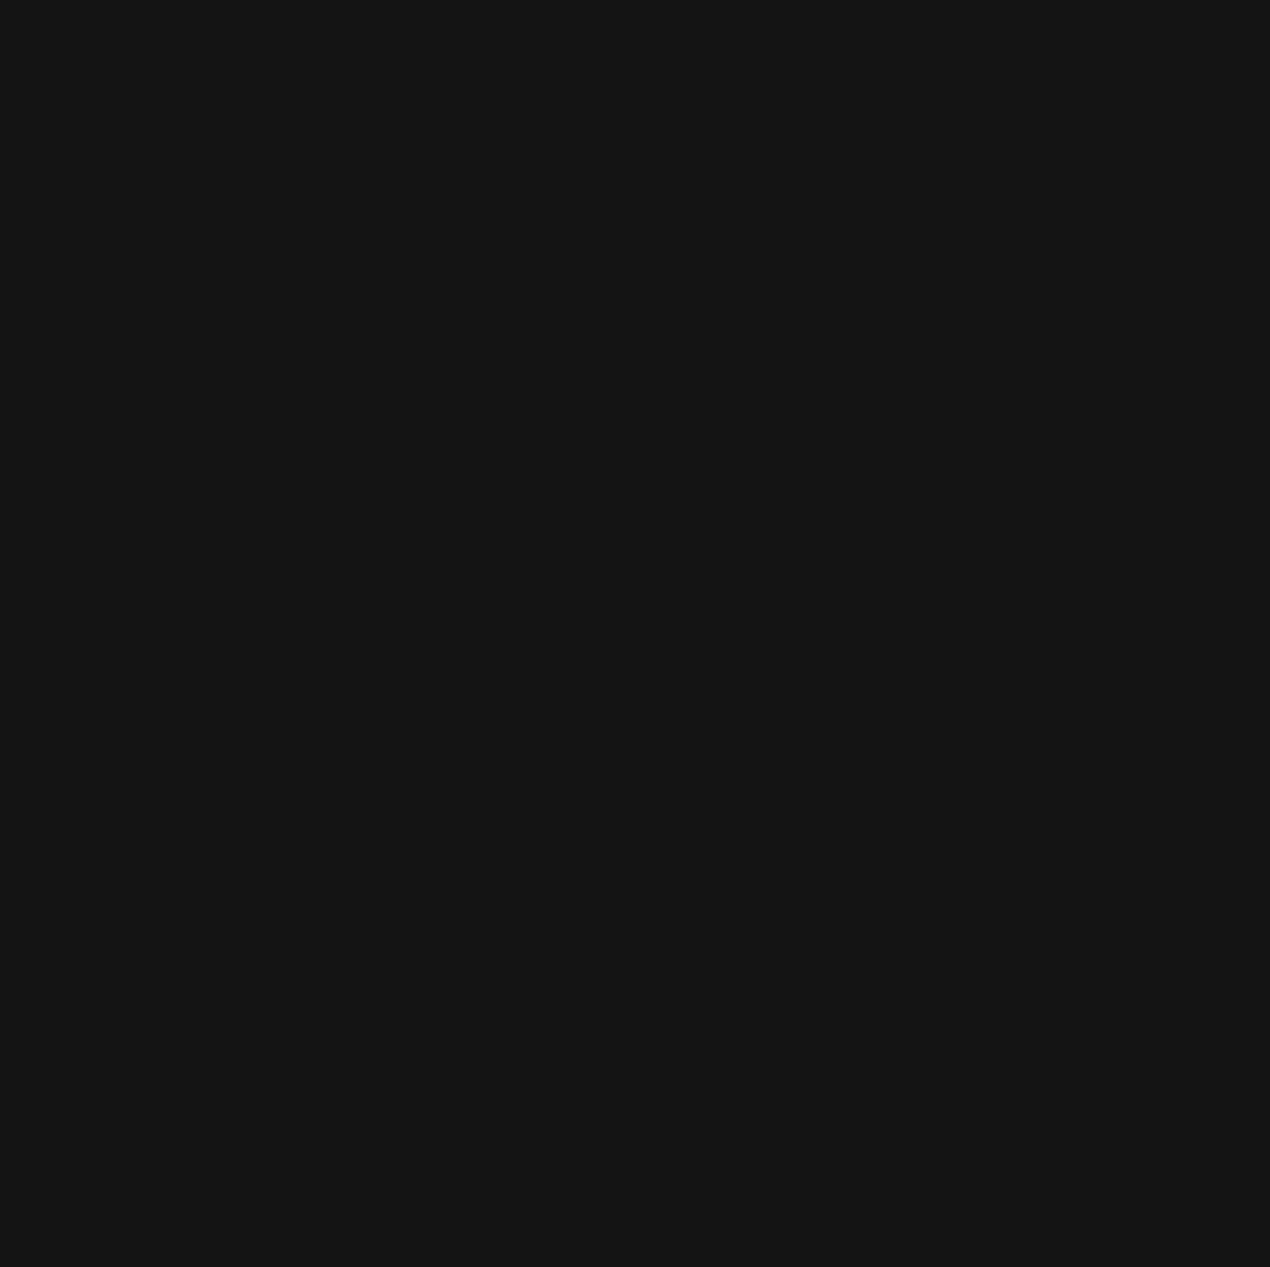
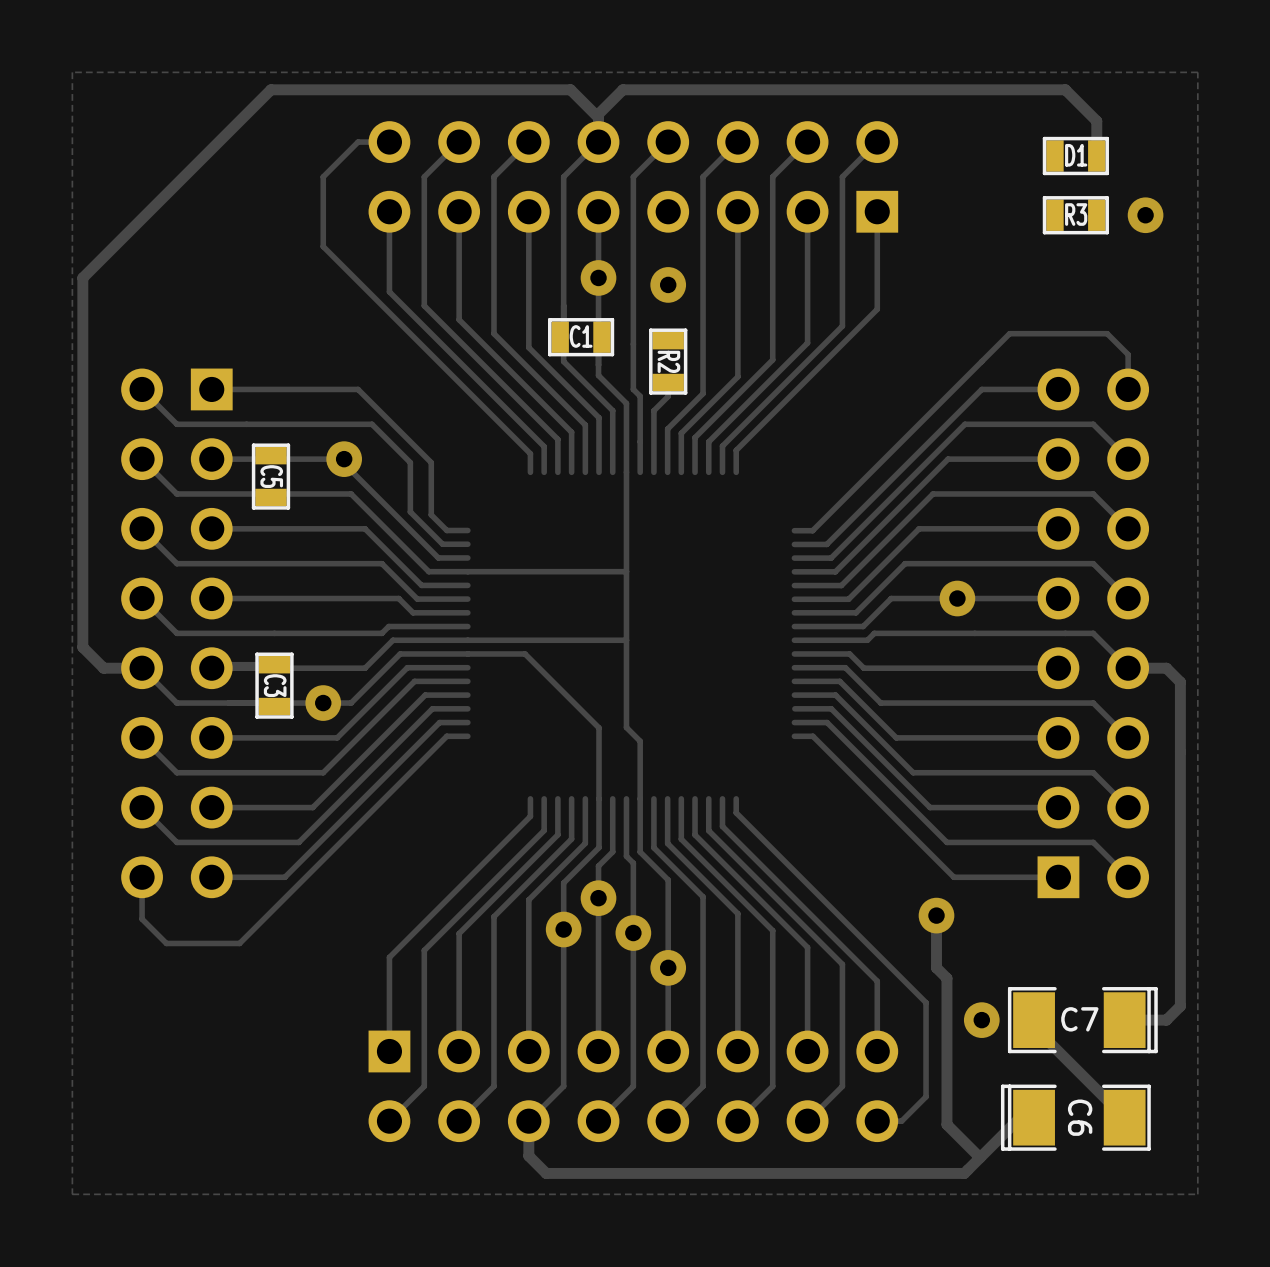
zone outline: none -> (1197, 72) (1197, 1194) (72, 1194) (72, 72) (1197, 72)
track: none -> (598, 117) (570, 89) (270, 89) (82, 277) (82, 647) (103, 668) (142, 668) (176, 703) (351, 703) (400, 653) (525, 653) (599, 727) (599, 847) (563, 882) (563, 1086) (528, 1121) (528, 1156) (546, 1173) (964, 1173) (1020, 1117)
track: none -> (389, 142) (358, 142) (323, 176) (323, 246) (530, 453) (530, 472)
track: none -> (459, 142) (424, 176) (424, 305) (557, 439) (557, 472)
track: none -> (528, 142) (493, 176) (493, 333) (585, 425) (585, 472)
track: none -> (668, 142) (633, 176) (633, 389) (640, 396) (640, 472)
track: none -> (737, 142) (703, 176) (703, 393) (667, 429) (667, 472)
track: none -> (807, 142) (772, 176) (772, 359) (695, 437) (695, 472)
track: none -> (877, 142) (842, 176) (842, 326) (722, 446) (722, 472)
D1: none -> (1075, 156)
track: none -> (1096, 156) (1096, 121) (1065, 89) (622, 89) (598, 114) (598, 142) (563, 176) (563, 361) (612, 410) (612, 472)
part: none -> (633, 176)
track: none -> (389, 211) (389, 291) (544, 446) (544, 472)
track: none -> (459, 211) (459, 319) (571, 432) (571, 472)
track: none -> (528, 211) (528, 347) (599, 417) (599, 472)
track: none -> (598, 211) (598, 375) (626, 403) (626, 727) (640, 741) (640, 852) (668, 880) (668, 1051)
track: none -> (737, 211) (737, 376) (681, 433) (681, 472)
track: none -> (807, 211) (807, 343) (708, 441) (708, 472)
track: none -> (877, 211) (877, 309) (736, 450) (736, 472)
R3: none -> (1075, 215)
via: none -> (1145, 215)
via: none -> (598, 277)
via: none -> (668, 284)
C1: none -> (581, 337)
R2: none -> (668, 361)
track: none -> (668, 382) (668, 396) (653, 410) (653, 472)
track: none -> (142, 389) (176, 424) (372, 424) (410, 462) (410, 511) (442, 544) (467, 544)
track: none -> (211, 389) (358, 389) (431, 462) (431, 514) (446, 530) (467, 530)
track: none -> (1058, 389) (981, 389) (826, 544) (794, 544)
track: none -> (1128, 389) (1128, 354) (1107, 333) (1009, 333) (812, 530) (794, 530)
track: none -> (142, 459) (176, 493) (351, 493) (428, 571) (626, 571)
track: none -> (211, 459) (339, 459) (438, 557) (467, 557)
via: none -> (344, 459)
track: none -> (1058, 459) (948, 459) (835, 571) (794, 571)
track: none -> (1128, 459) (1093, 424) (964, 424) (831, 558) (794, 558)
C5: none -> (270, 476)
track: none -> (142, 528) (176, 563) (381, 563) (417, 599) (467, 599)
track: none -> (211, 528) (365, 528) (421, 585) (467, 585)
track: none -> (1058, 528) (919, 528) (848, 599) (794, 599)
track: none -> (1128, 528) (1093, 493) (933, 493) (841, 585) (794, 585)
track: none -> (142, 598) (176, 633) (381, 633) (388, 626) (467, 626)
track: none -> (211, 598) (398, 598) (413, 612) (467, 612)
via: none -> (957, 598)
track: none -> (1058, 598) (891, 598) (863, 626) (794, 626)
track: none -> (1128, 598) (1093, 563) (905, 563) (856, 612) (794, 612)
part: none -> (176, 633)
part: none -> (1093, 633)
track: none -> (626, 640) (393, 640) (365, 668) (211, 668) (215, 664) (274, 664)
track: none -> (794, 640) (867, 640) (874, 633) (1093, 633) (1128, 668) (1166, 668) (1180, 682) (1180, 1006) (1166, 1020) (1124, 1020)
track: none -> (794, 653) (849, 653) (863, 668) (1058, 668)
track: none -> (467, 667) (407, 667) (337, 737) (211, 737)
track: none -> (794, 667) (845, 667) (880, 703) (1093, 703) (1128, 737)
track: none -> (467, 681) (414, 681) (323, 772) (176, 772) (142, 737)
track: none -> (794, 681) (839, 681) (896, 737) (1058, 737)
C3: none -> (274, 685)
track: none -> (467, 695) (425, 695) (312, 807) (211, 807)
track: none -> (794, 695) (835, 695) (913, 772) (1093, 772) (1128, 807)
via: none -> (323, 703)
track: none -> (467, 708) (432, 708) (298, 842) (176, 842) (142, 807)
track: none -> (794, 708) (831, 708) (930, 807) (1058, 807)
track: none -> (467, 722) (439, 722) (284, 877) (211, 877)
track: none -> (794, 722) (827, 722) (946, 842) (1093, 842) (1128, 877)
track: none -> (467, 736) (446, 736) (239, 943) (166, 943) (142, 919) (142, 877)
track: none -> (794, 736) (812, 736) (953, 877) (1058, 877)
track: none -> (530, 798) (530, 816) (389, 957) (389, 1051)
track: none -> (544, 798) (544, 830) (424, 950) (424, 1086) (389, 1121)
track: none -> (557, 798) (557, 834) (459, 933) (459, 1051)
track: none -> (571, 798) (571, 839) (493, 916) (493, 1086) (459, 1121)
track: none -> (585, 798) (585, 843) (528, 899) (528, 1051)
track: none -> (612, 798) (612, 851) (598, 866) (598, 1051)
track: none -> (626, 798) (626, 856) (633, 863) (633, 1086) (598, 1121)
track: none -> (653, 798) (653, 847) (703, 896) (703, 1086) (668, 1121)
track: none -> (667, 798) (667, 843) (737, 913) (737, 1051)
track: none -> (681, 798) (681, 839) (772, 930) (772, 1086) (737, 1121)
track: none -> (695, 798) (695, 834) (807, 947) (807, 1051)
track: none -> (708, 798) (708, 830) (842, 964) (842, 1086) (807, 1121)
track: none -> (722, 798) (722, 826) (877, 981) (877, 1051)
track: none -> (736, 798) (736, 812) (926, 1002) (926, 1096) (901, 1121) (877, 1121)
via: none -> (598, 898)
track: none -> (936, 915) (936, 967) (946, 978) (946, 1124) (980, 1157)
via: none -> (936, 915)
via: none -> (563, 929)
via: none -> (633, 933)
via: none -> (668, 967)
via: none -> (981, 1020)
C7: none -> (1082, 1020)
track: none -> (1034, 1027) (1124, 1117) (1034, 1027)
part: none -> (633, 1086)
C6: none -> (1075, 1117)

